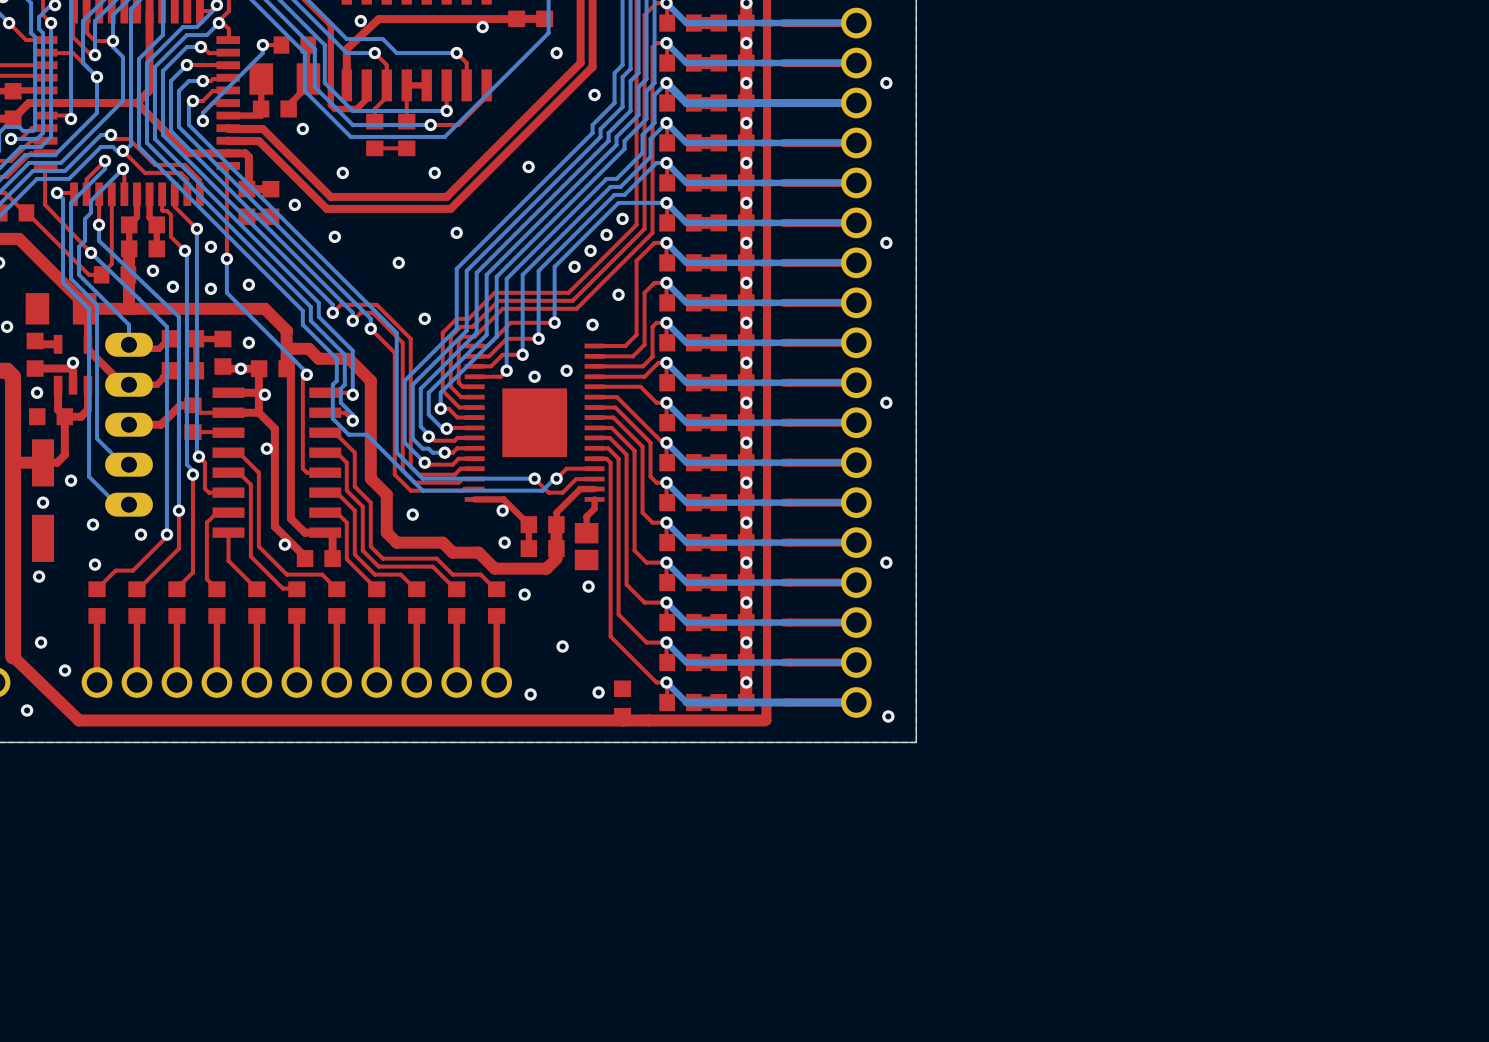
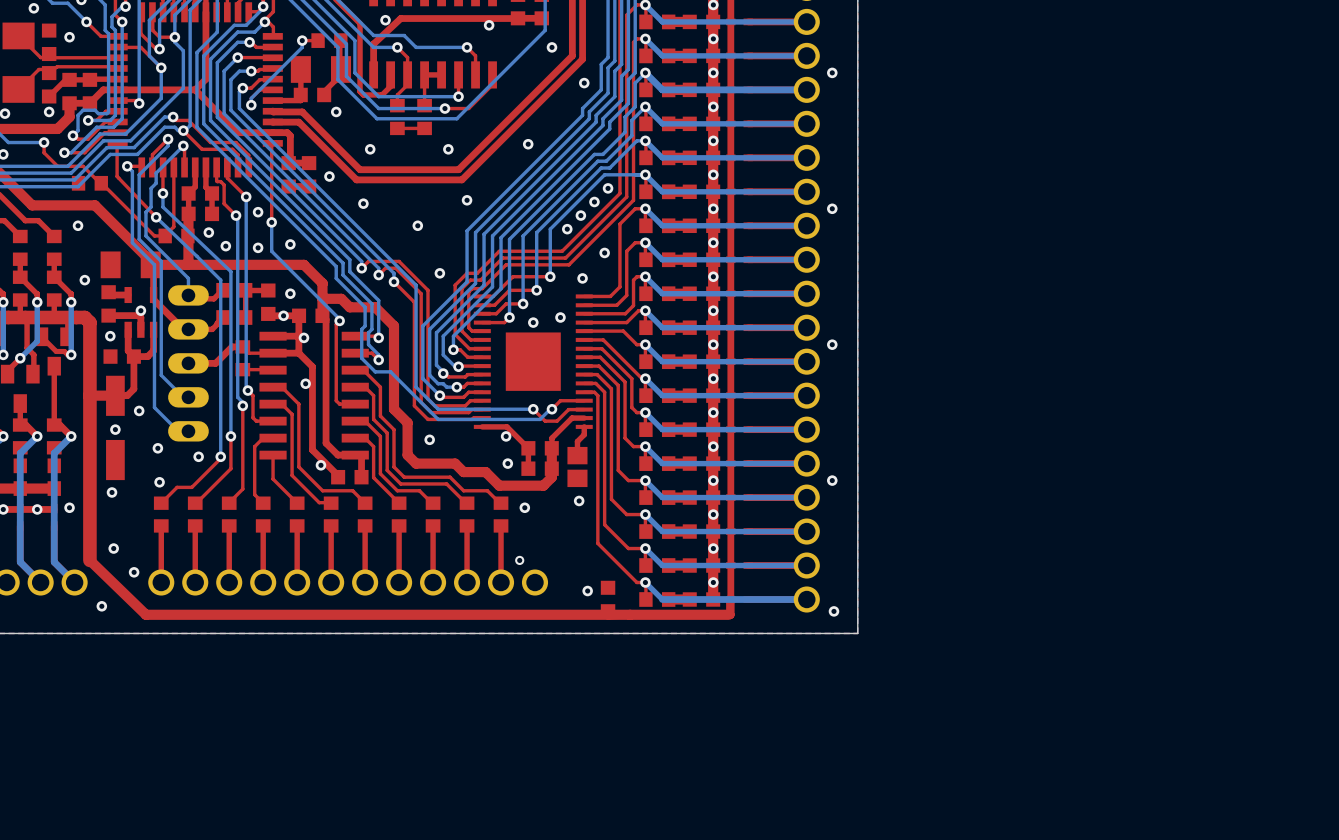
via: (562, 646) -> none
via: none -> (519, 560)
part: none -> (348, 582)
via: (530, 694) -> none

